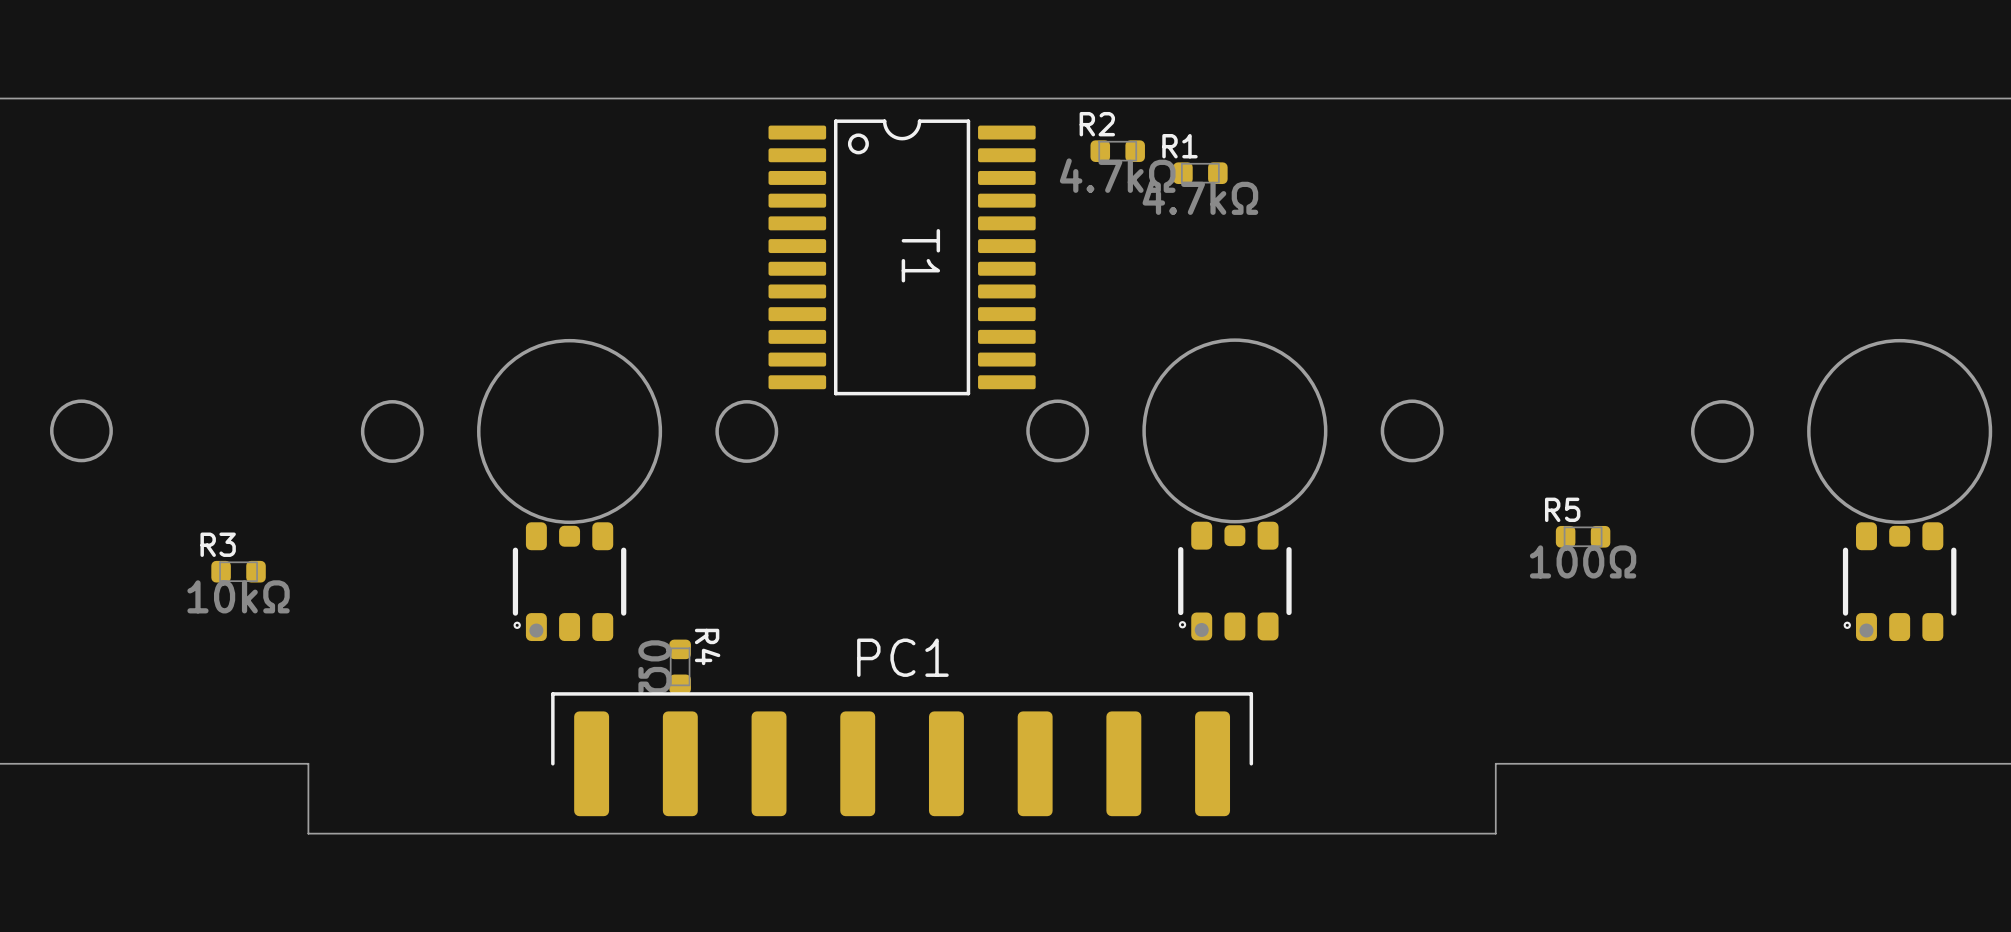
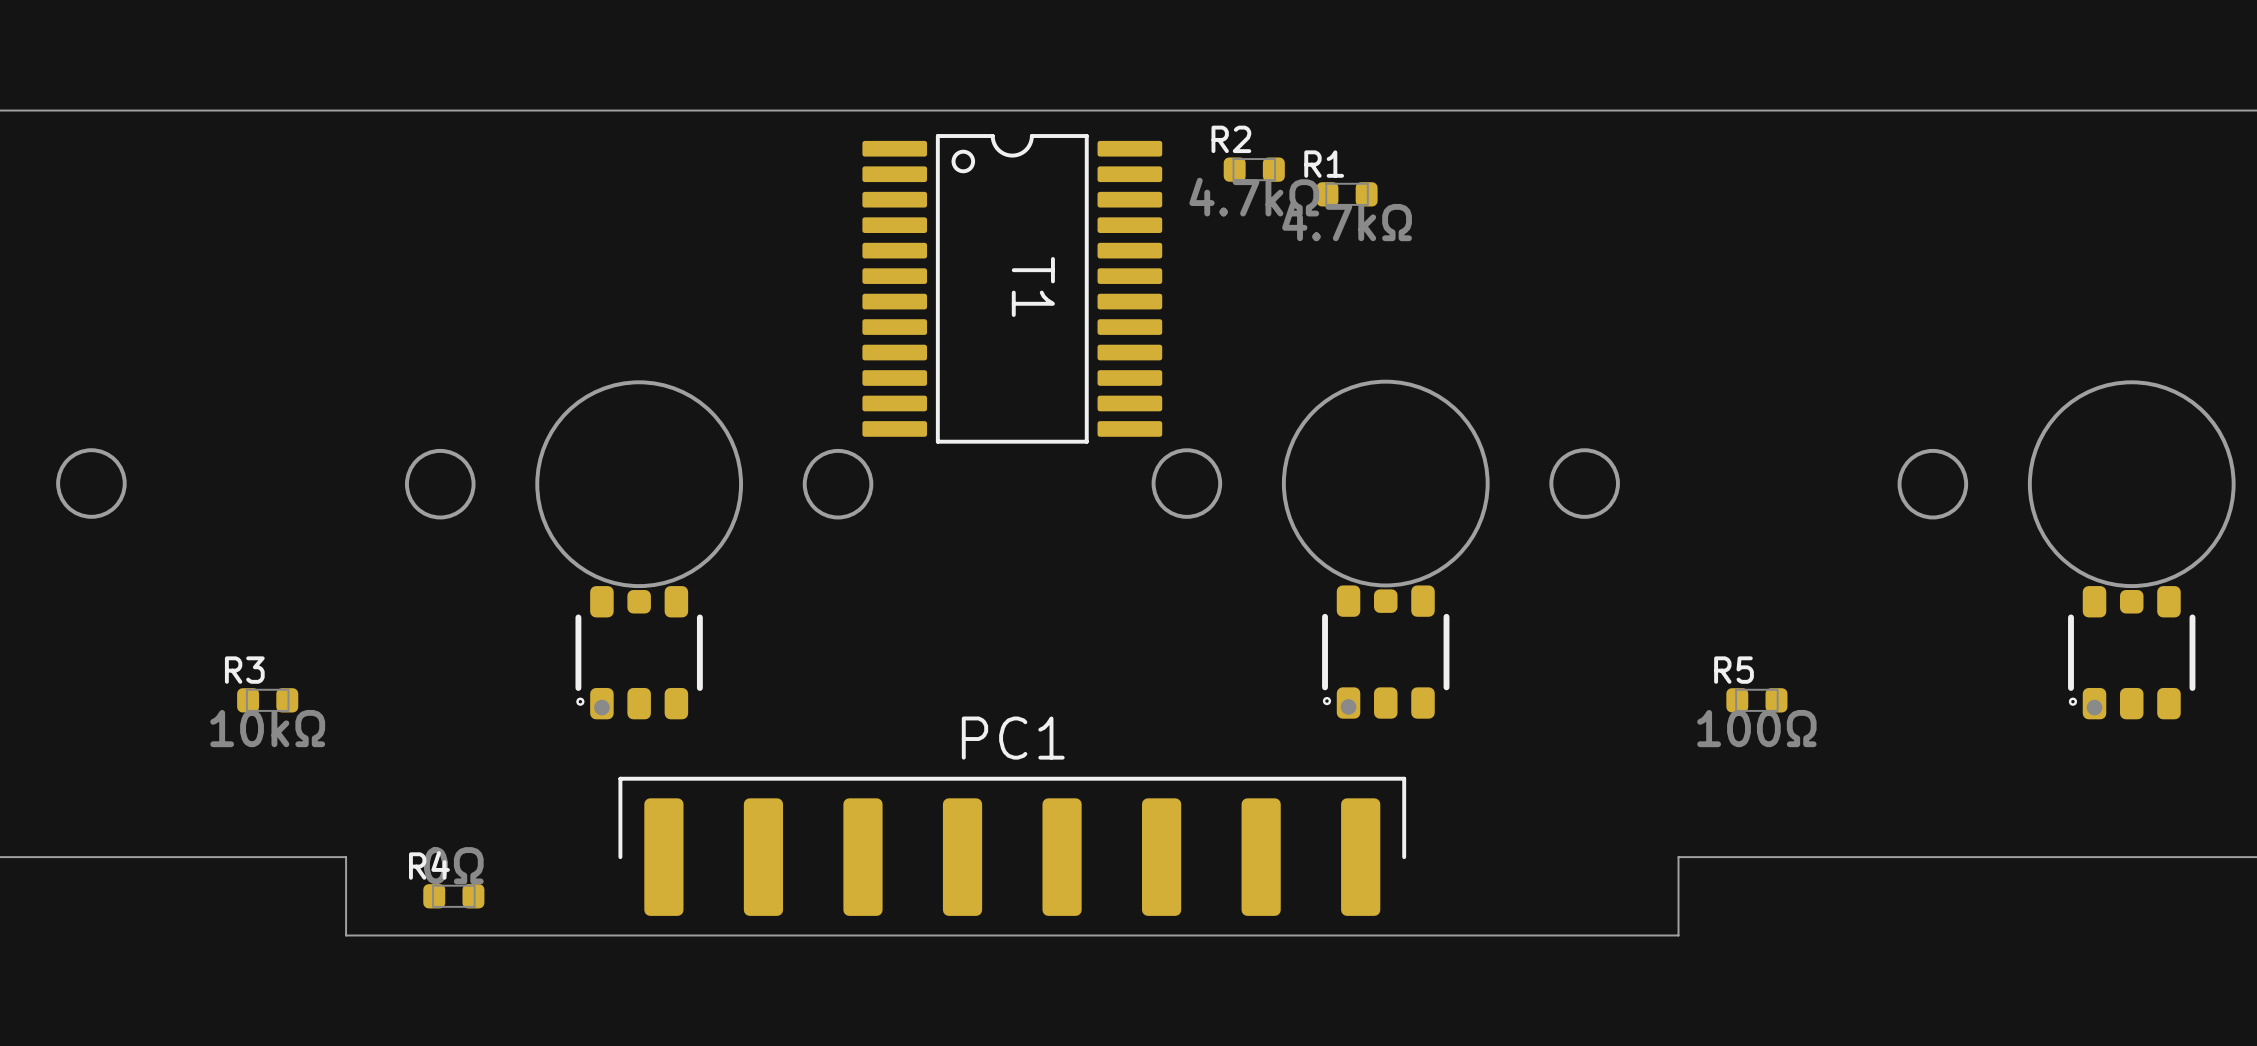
R5 position: (1583, 536) -> (1756, 700)
R3 position: (238, 571) -> (267, 700)
R4 rotation: 0° (680, 666) -> 90° clockwise (453, 896)
R4 position: (680, 666) -> (453, 896)

